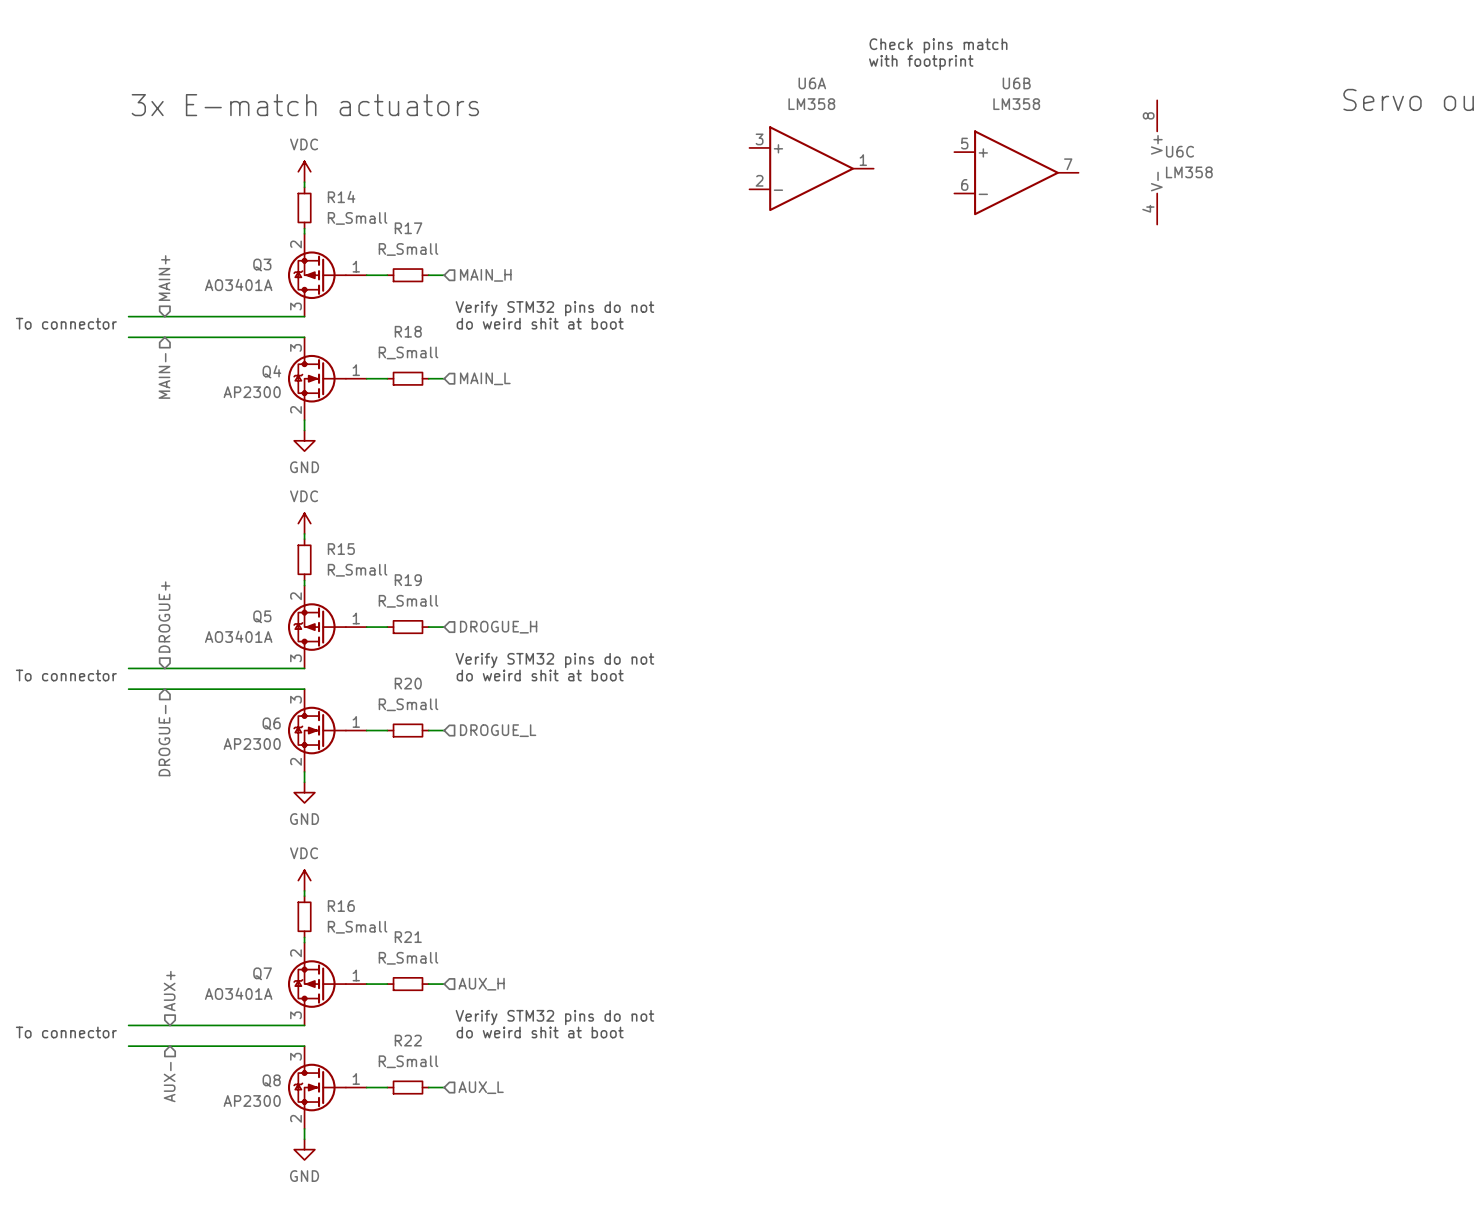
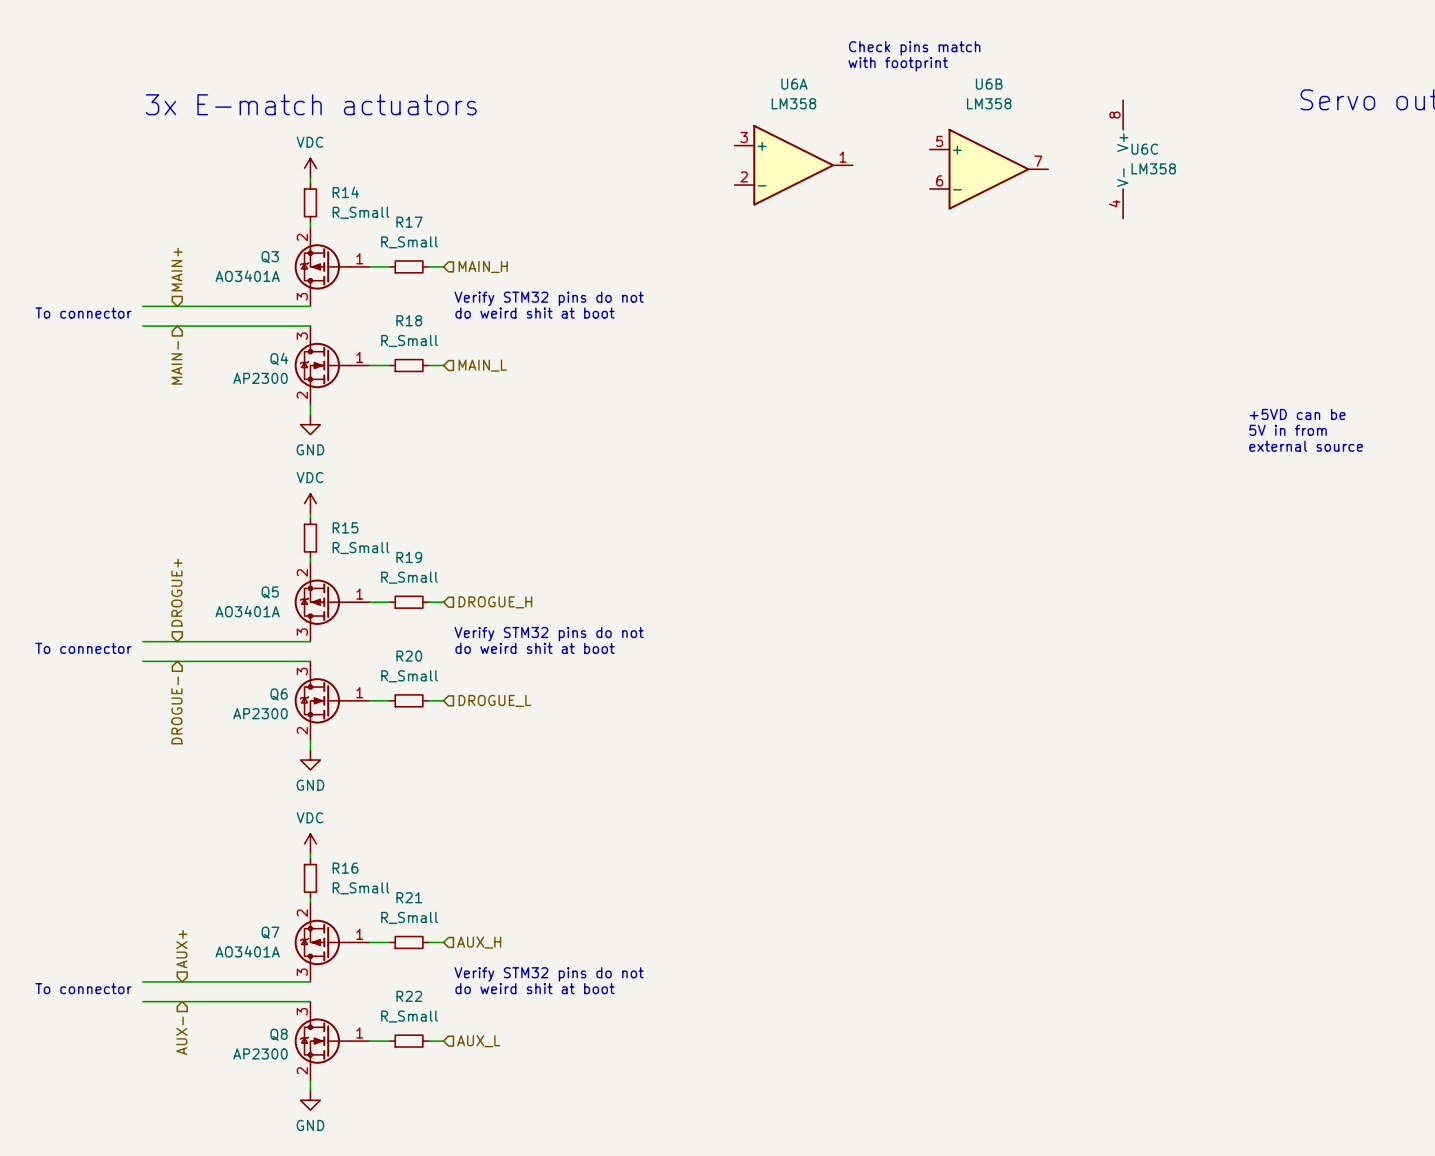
text: none -> +5VD can be (1297, 414)
text: none -> 5V in from (1288, 430)
text: none -> external source (1306, 446)

